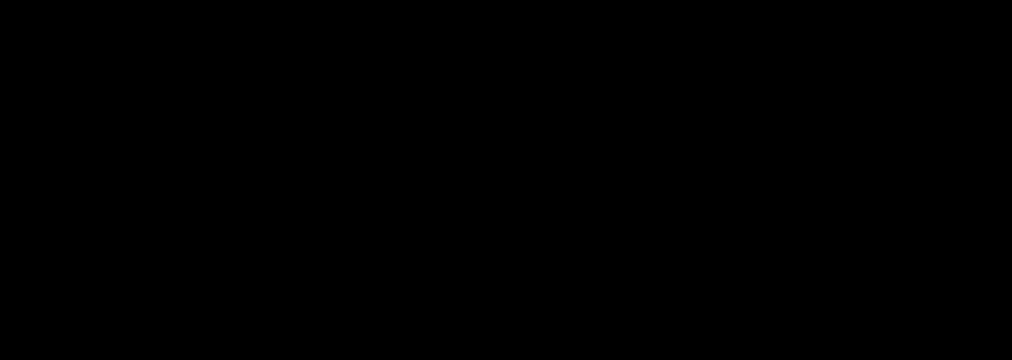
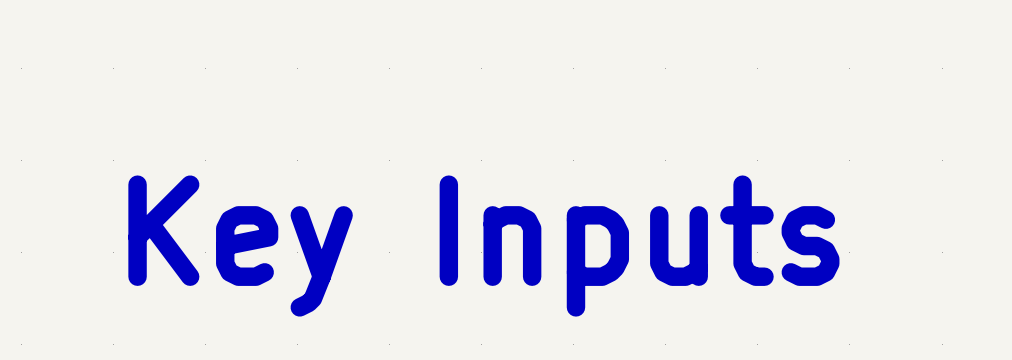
text: none -> Key Inputs (483, 246)

